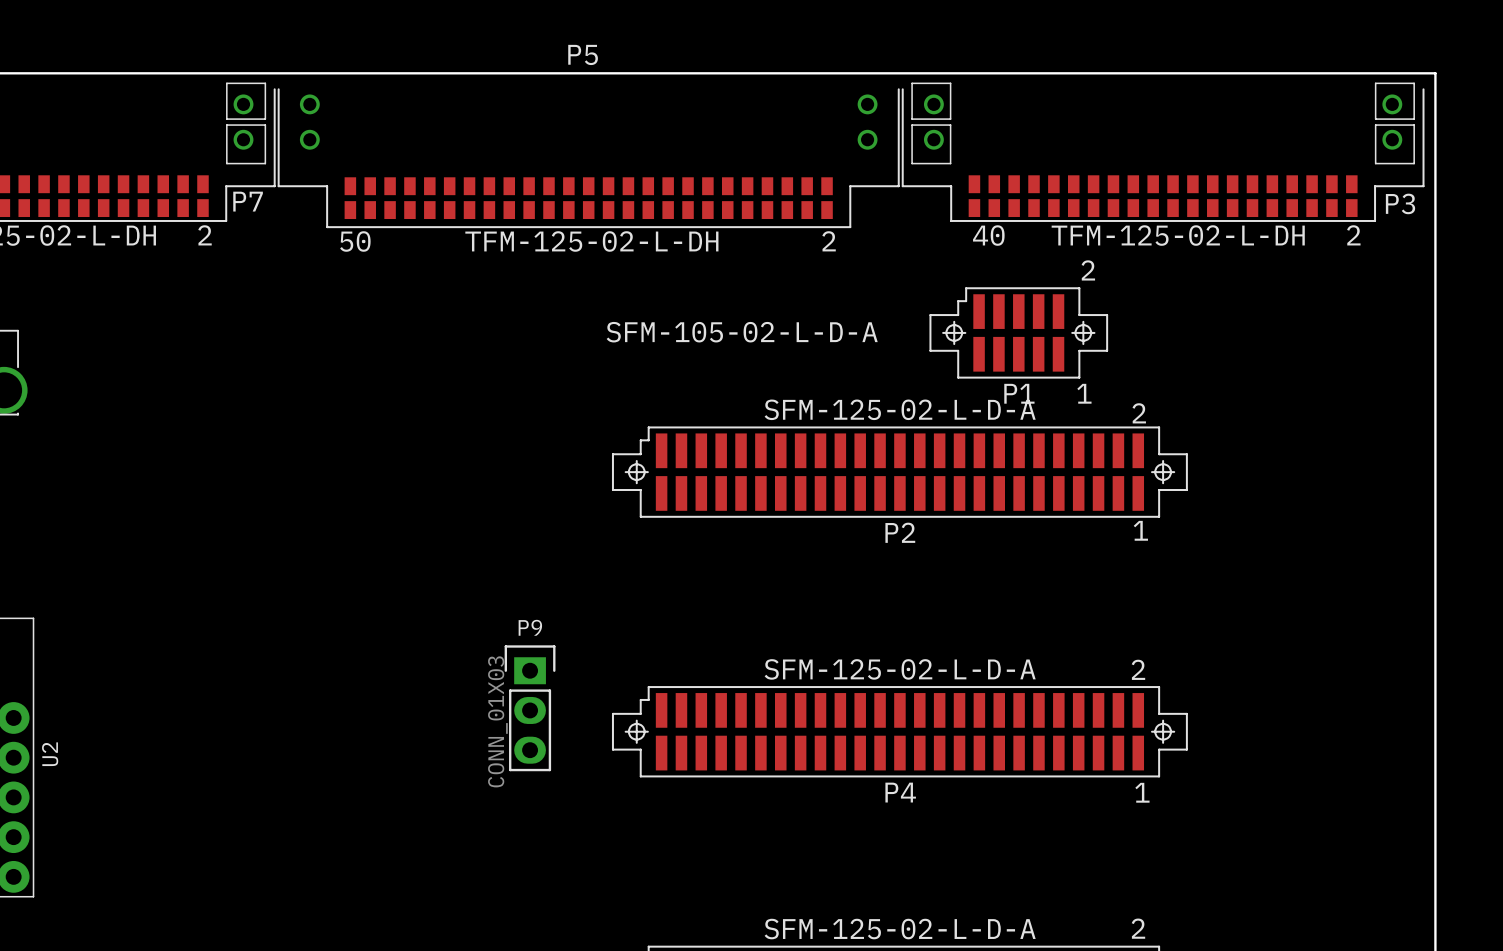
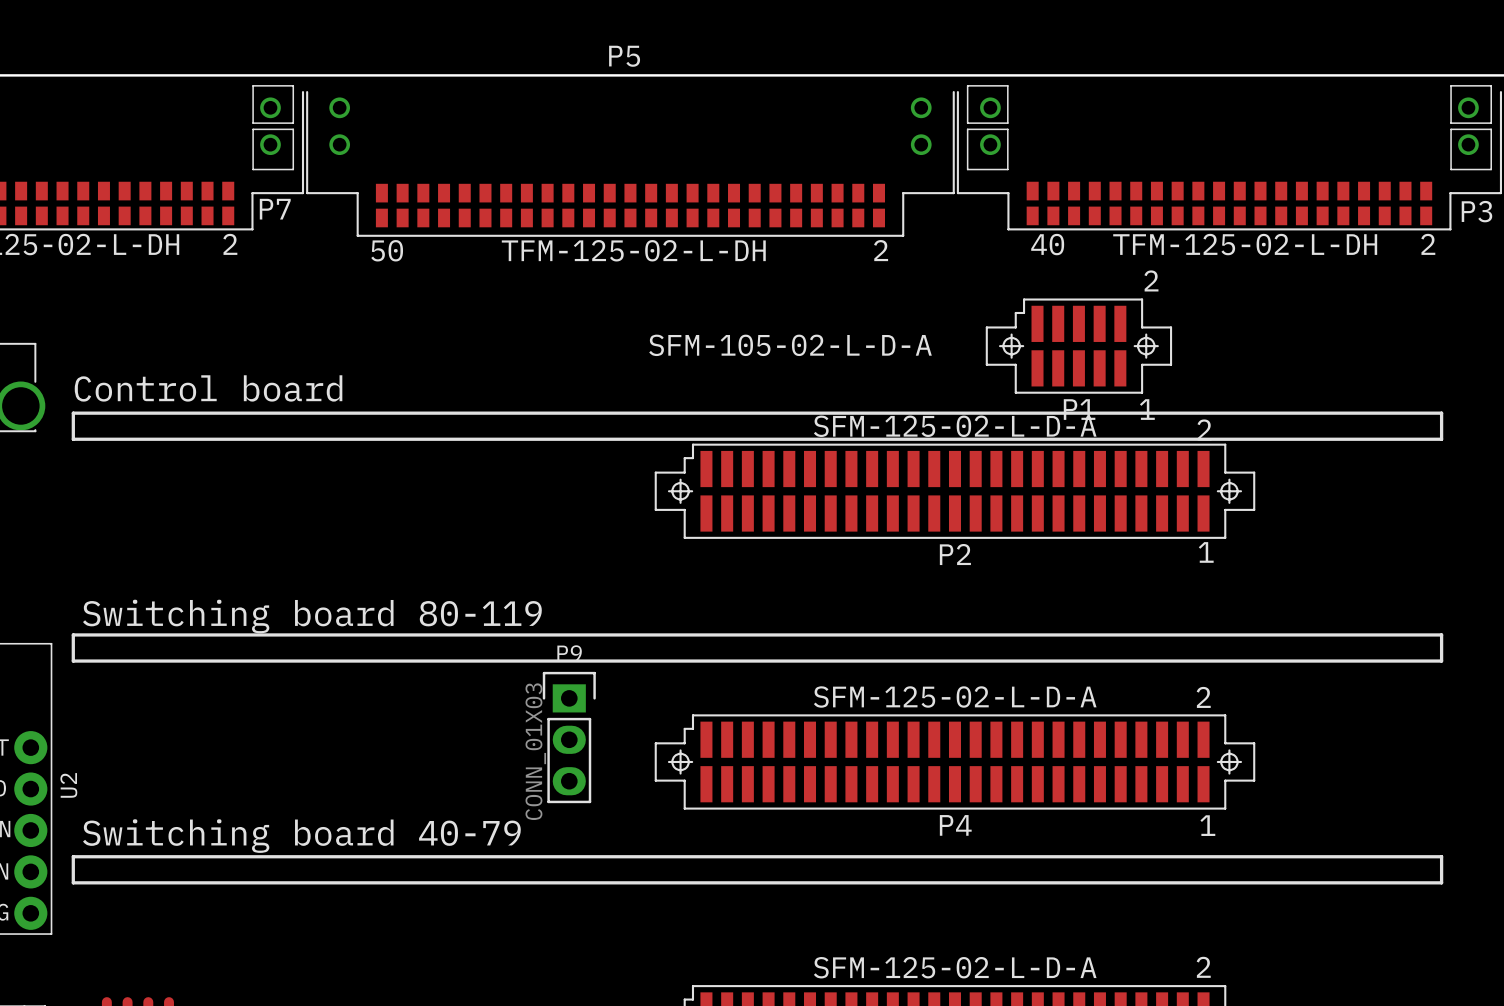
text: none -> Control board (208, 388)
line: none -> (73, 413) (73, 439) (1441, 439) (1441, 413) (73, 413)
text: none -> Switching board 80-119 (312, 616)
line: none -> (73, 634) (73, 661) (1441, 661) (1441, 634) (73, 634)
text: none -> Switching board 40-79 (301, 836)
line: none -> (73, 856) (73, 882) (1441, 882) (1441, 856) (73, 856)

